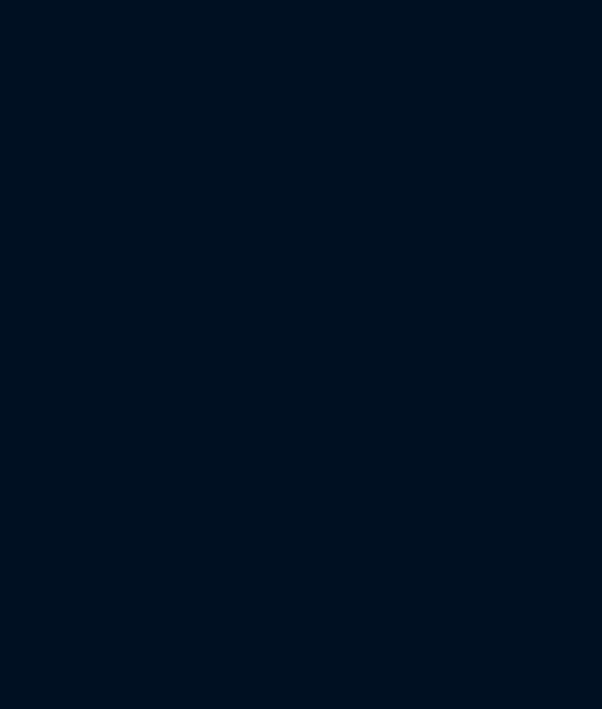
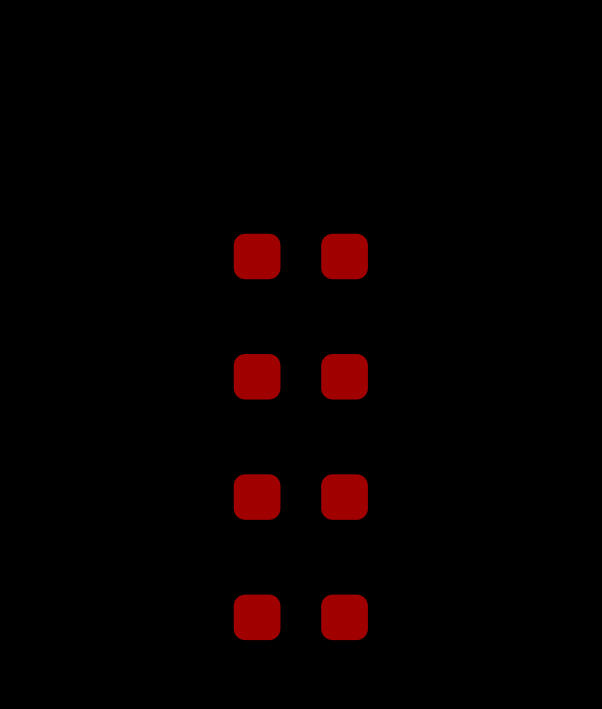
part: none -> (300, 256)
part: none -> (300, 376)
part: none -> (300, 497)
part: none -> (300, 617)

